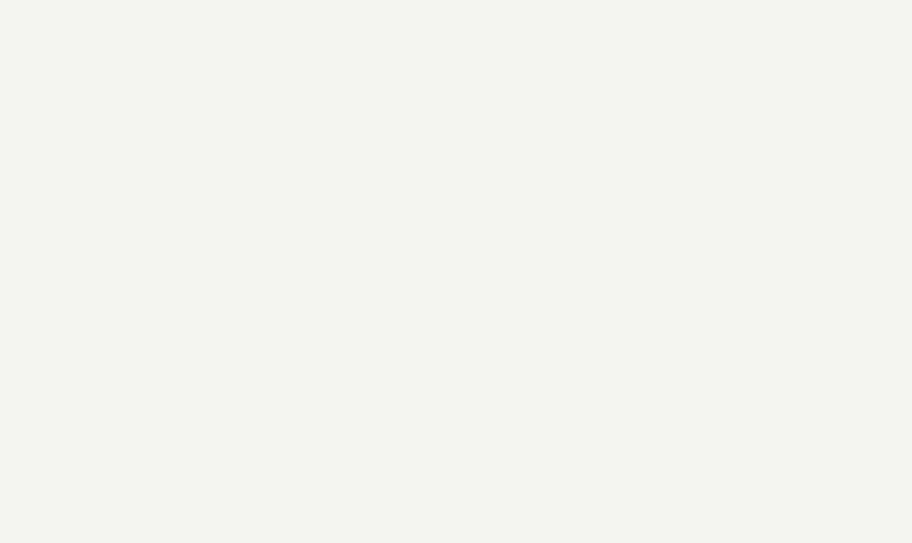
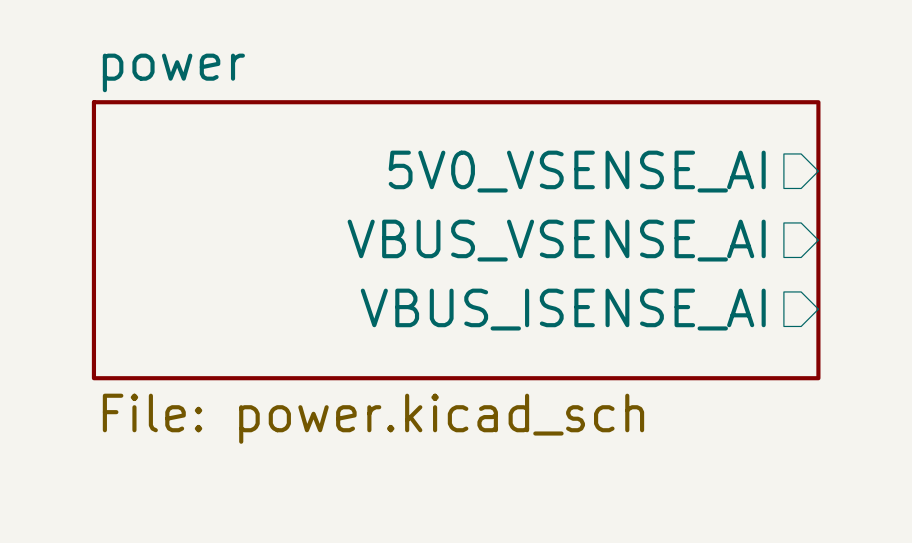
sheet pin: none -> 5V0_VSENSE_AI (577, 171)
sheet power: none -> File: power.kicad_sch (456, 240)
sheet pin: none -> VBUS_VSENSE_AI (556, 240)
sheet pin: none -> VBUS_ISENSE_AI (563, 309)

